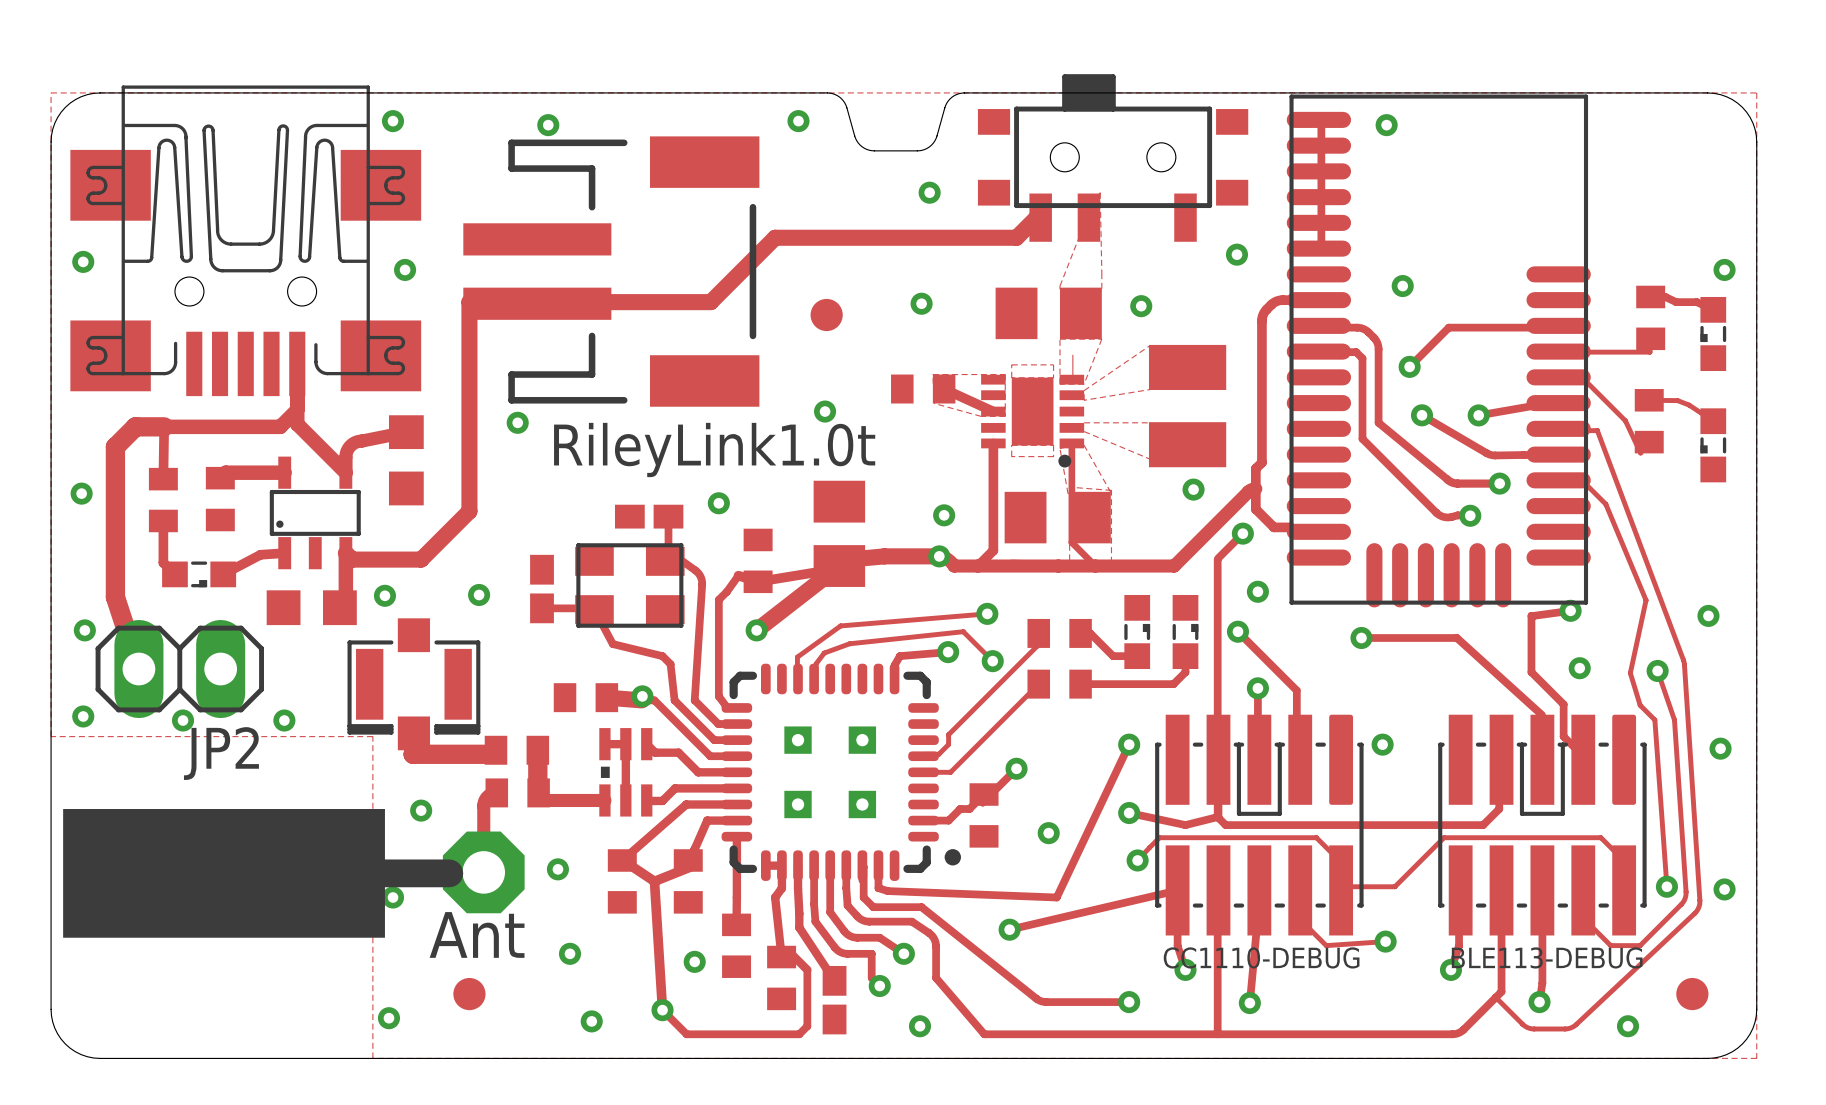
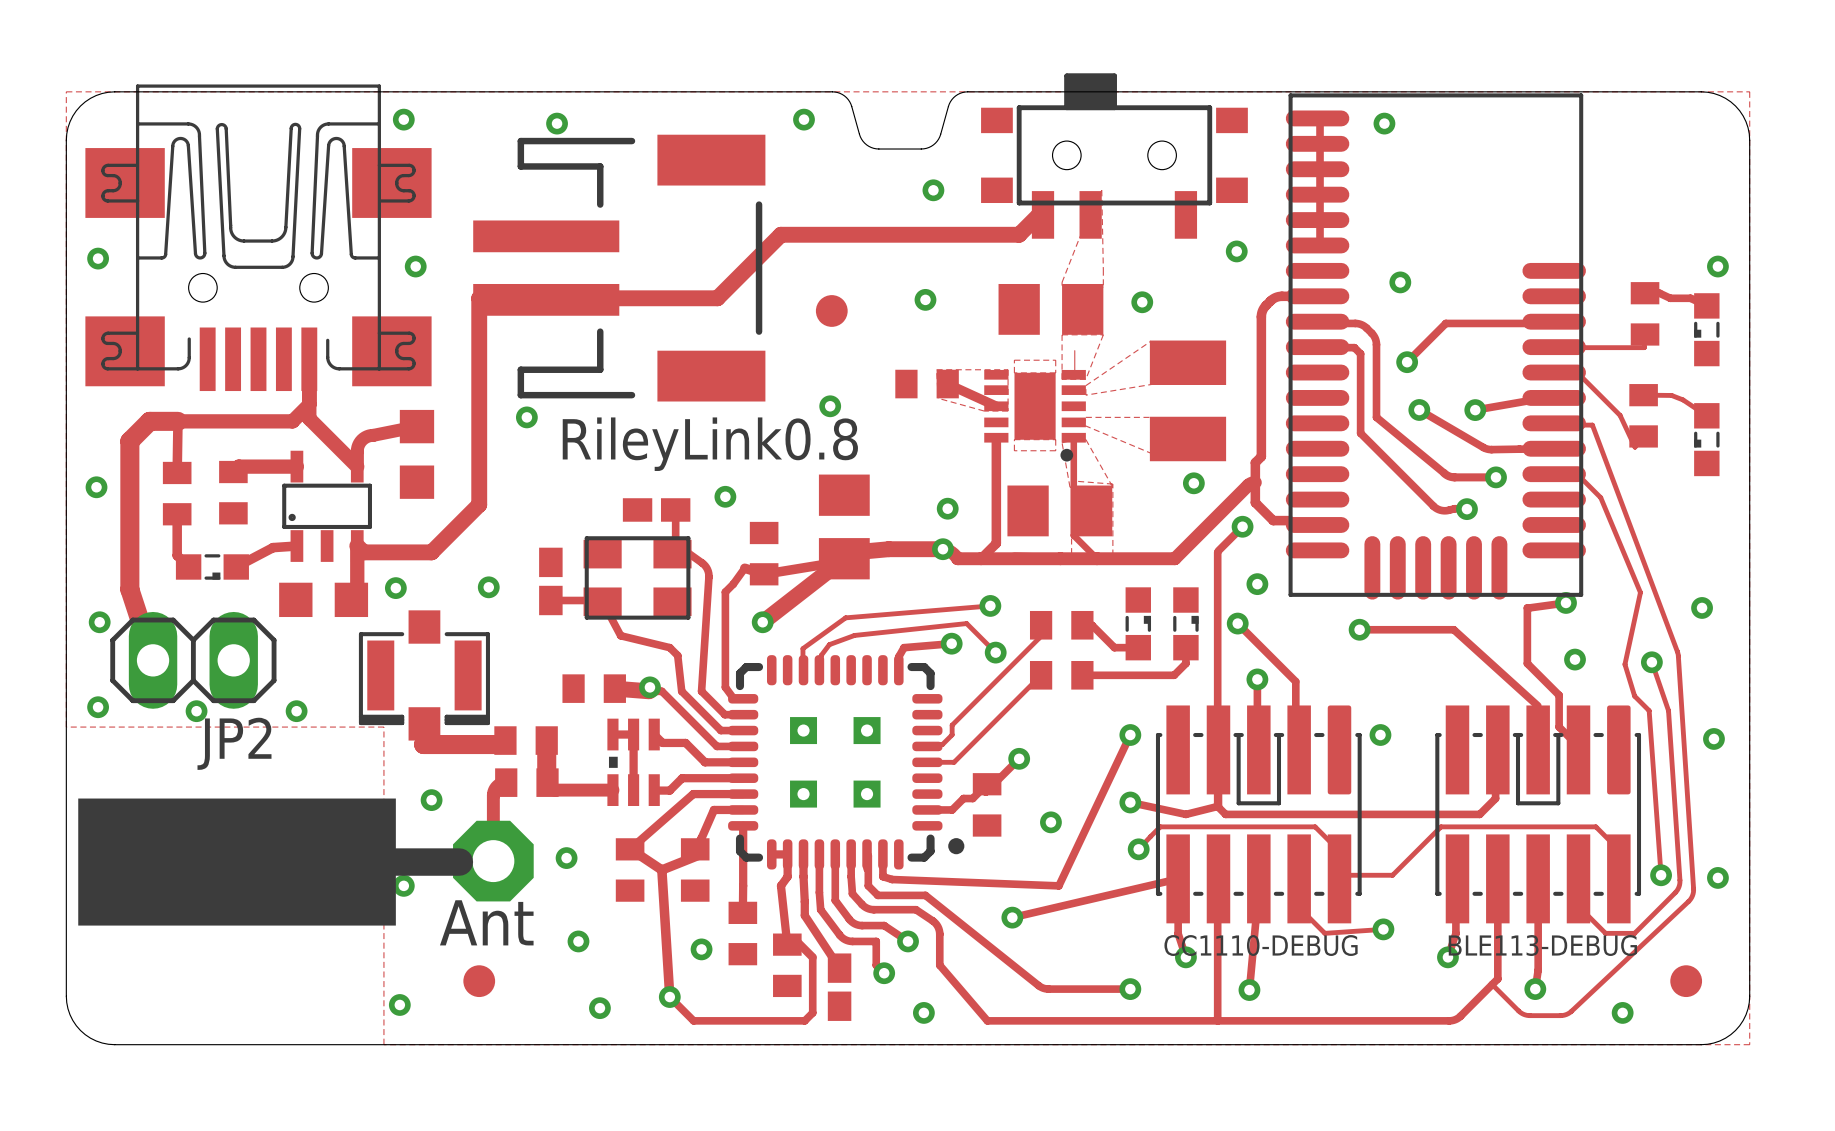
text: RileyLink1.0t (714, 449) -> RileyLink0.8 (710, 444)

